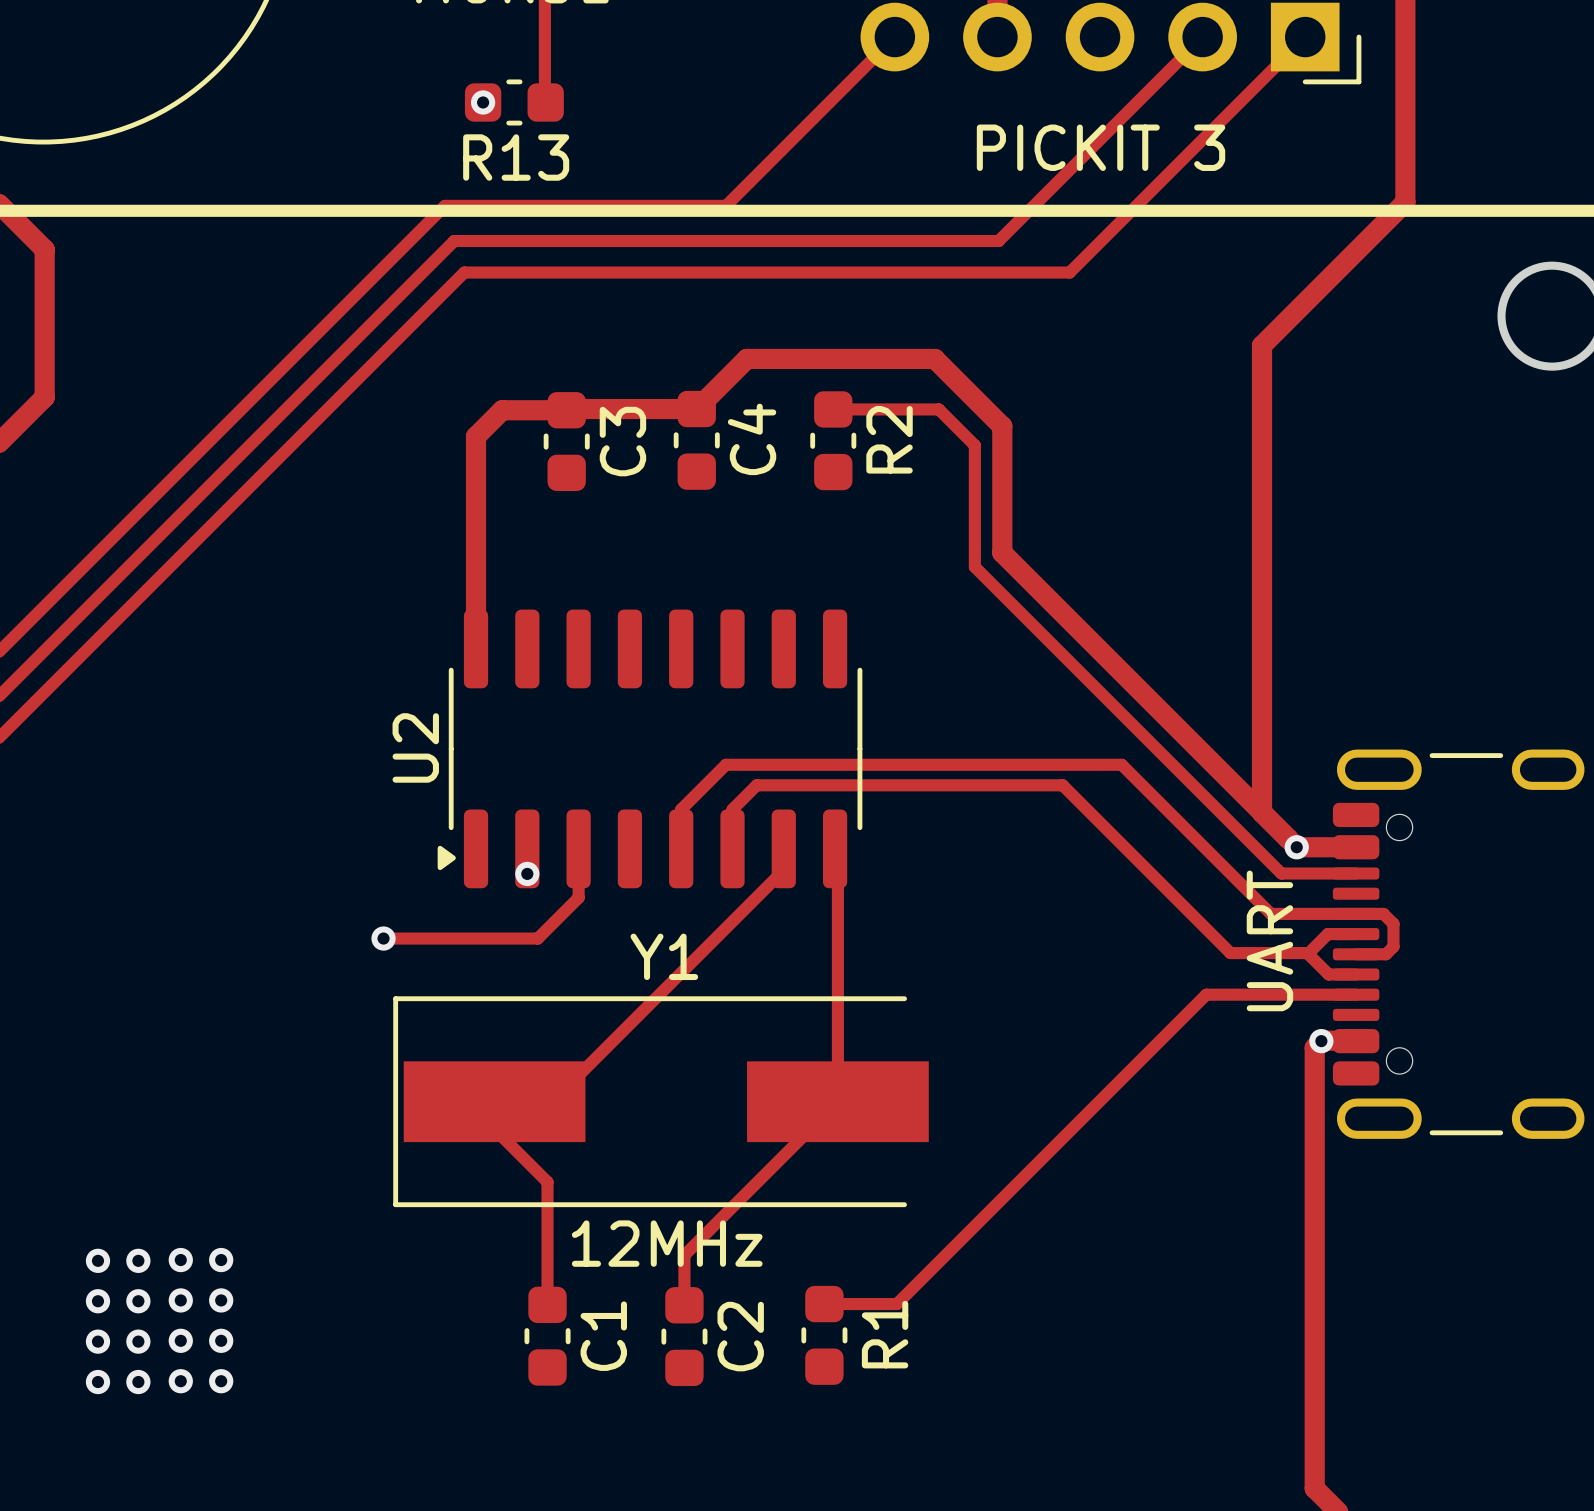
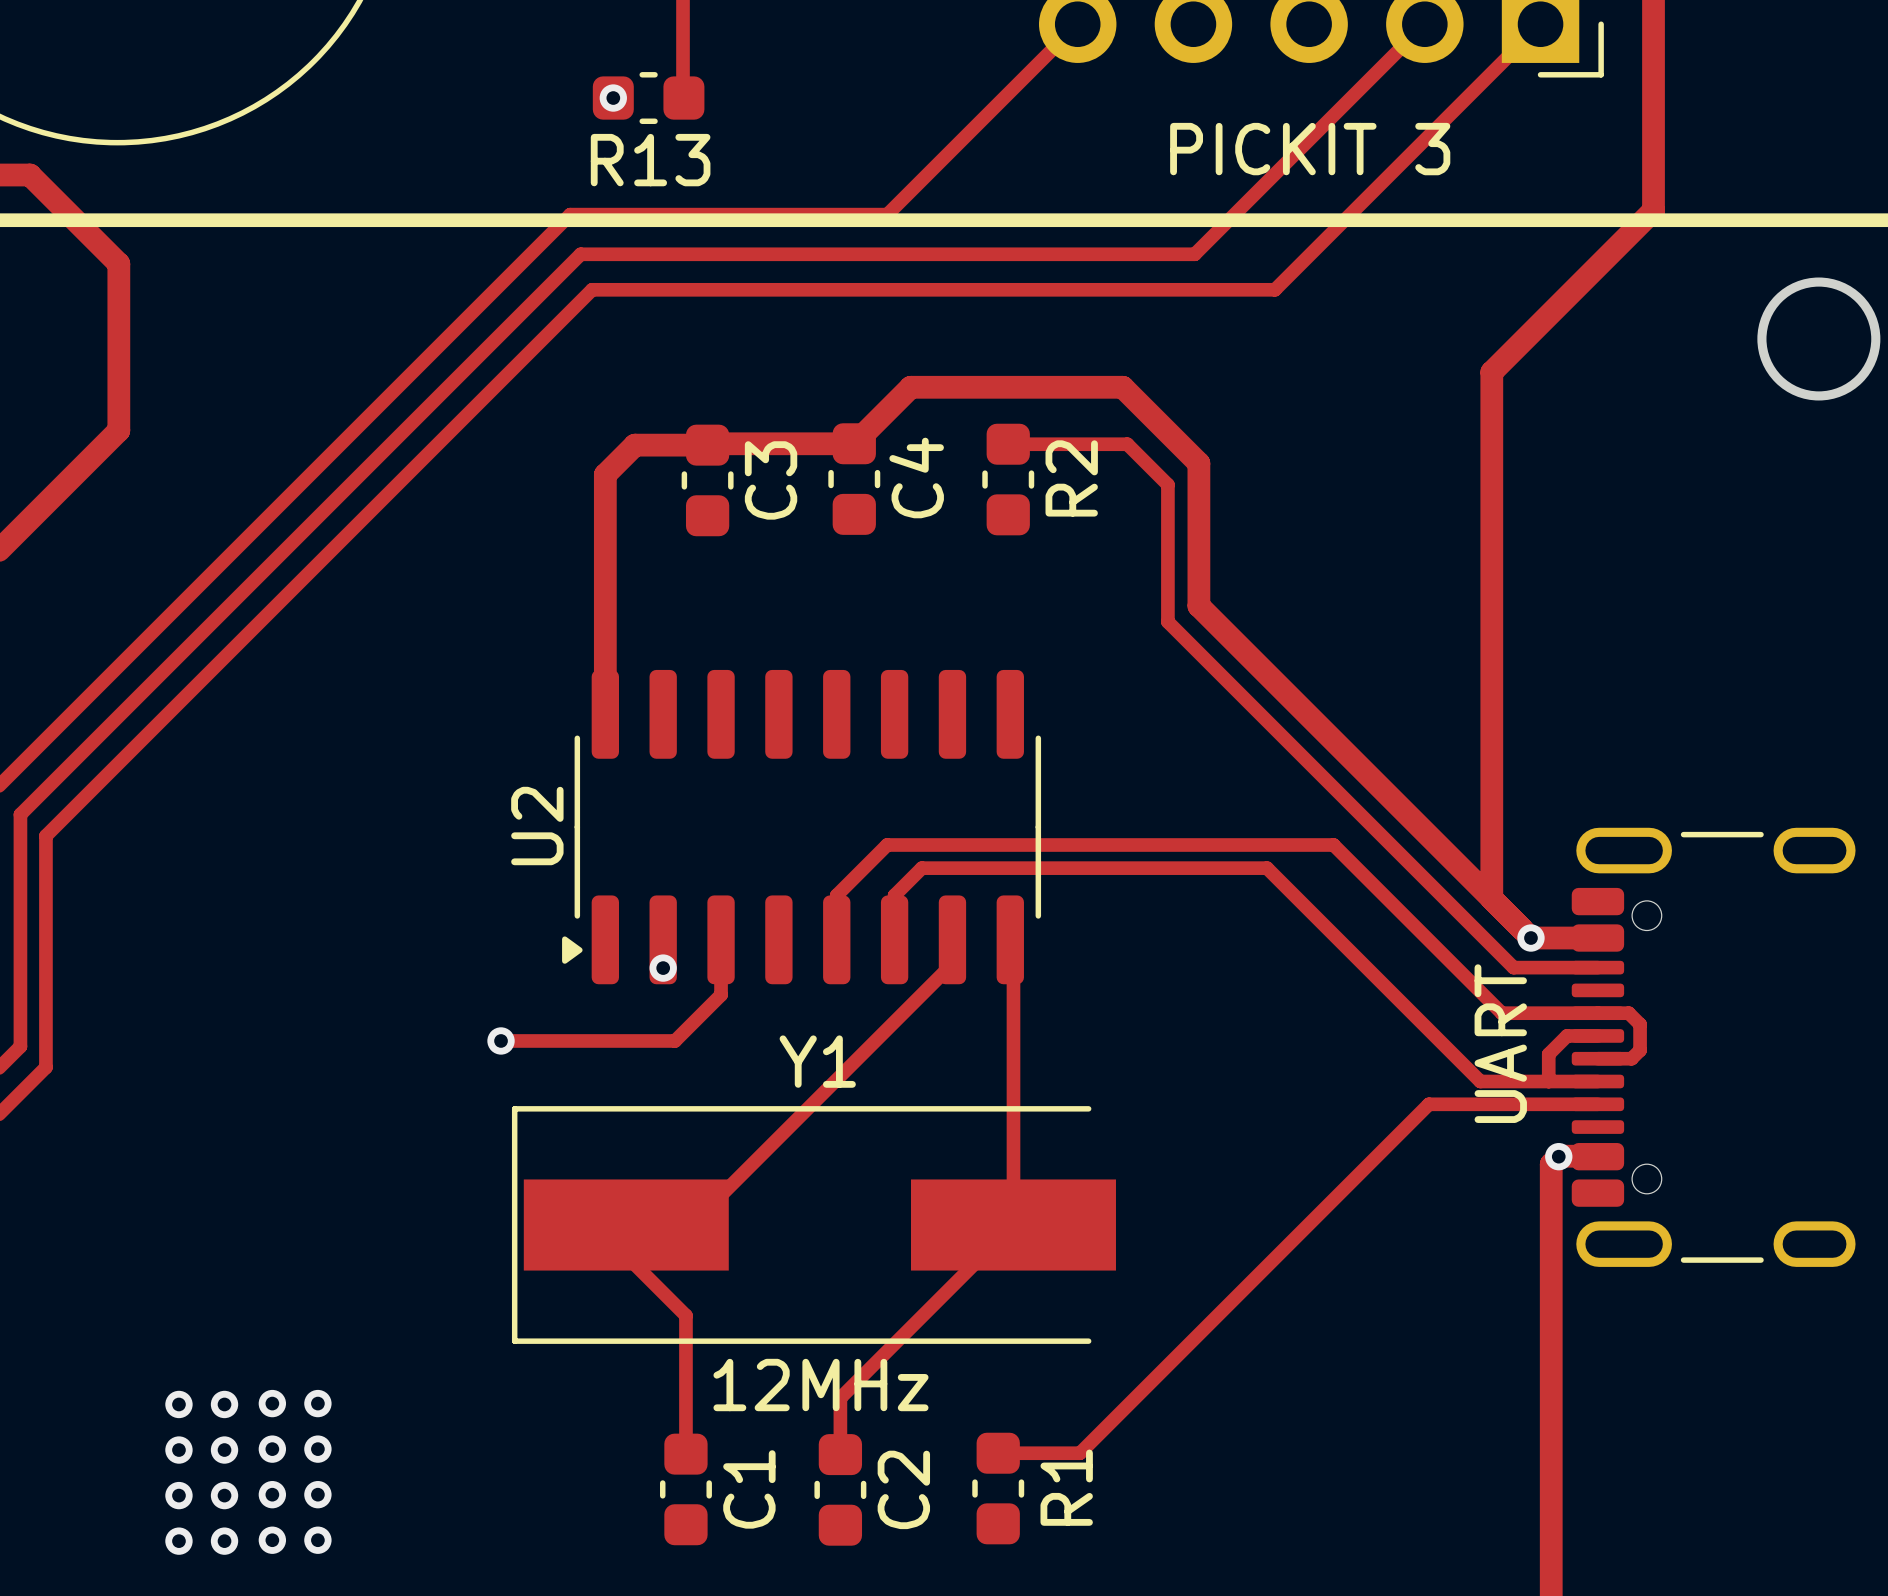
track: (1328, 934) (1308, 953) -> (1567, 1035) (1548, 1054) (1548, 1081)
track: (1230, 953) (1308, 953) -> (1456, 1057) (1480, 1081) (1567, 1081)
track: (1308, 953) (1328, 974) -> none

